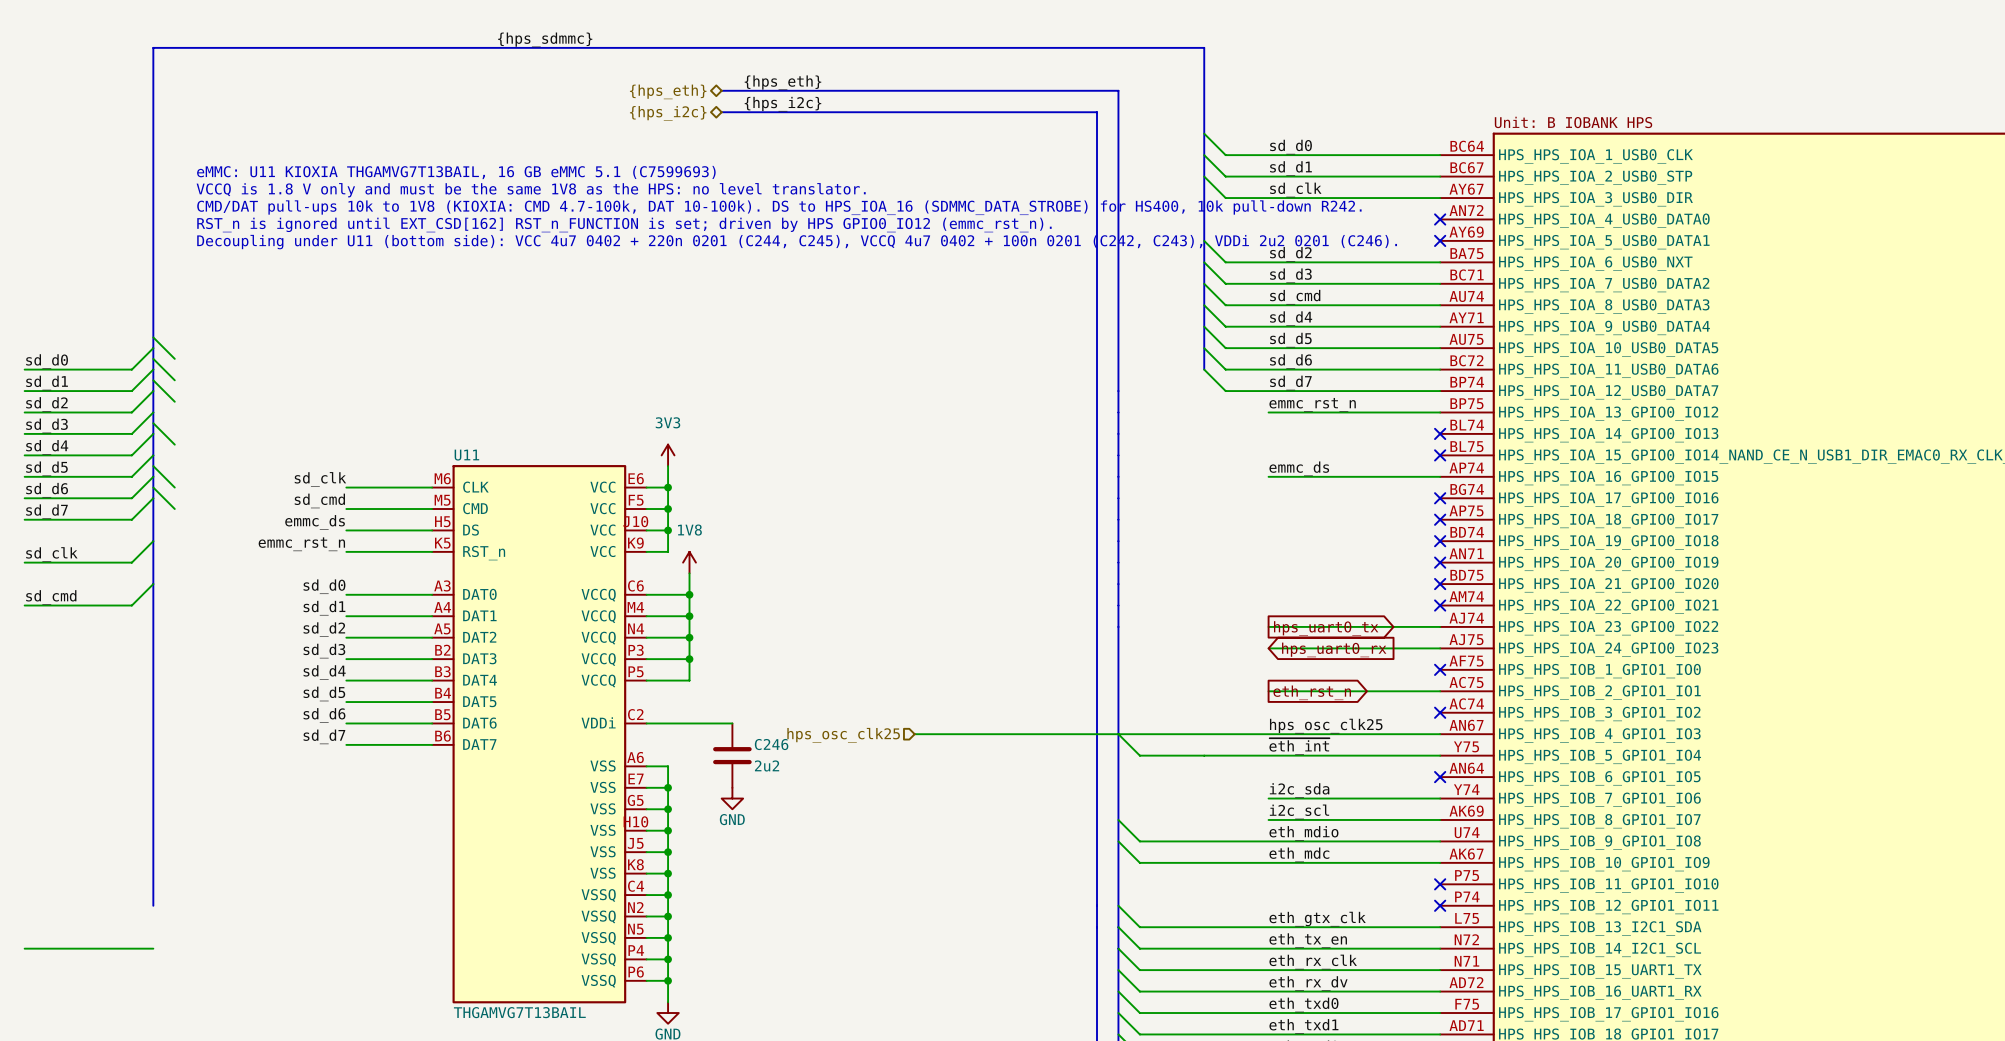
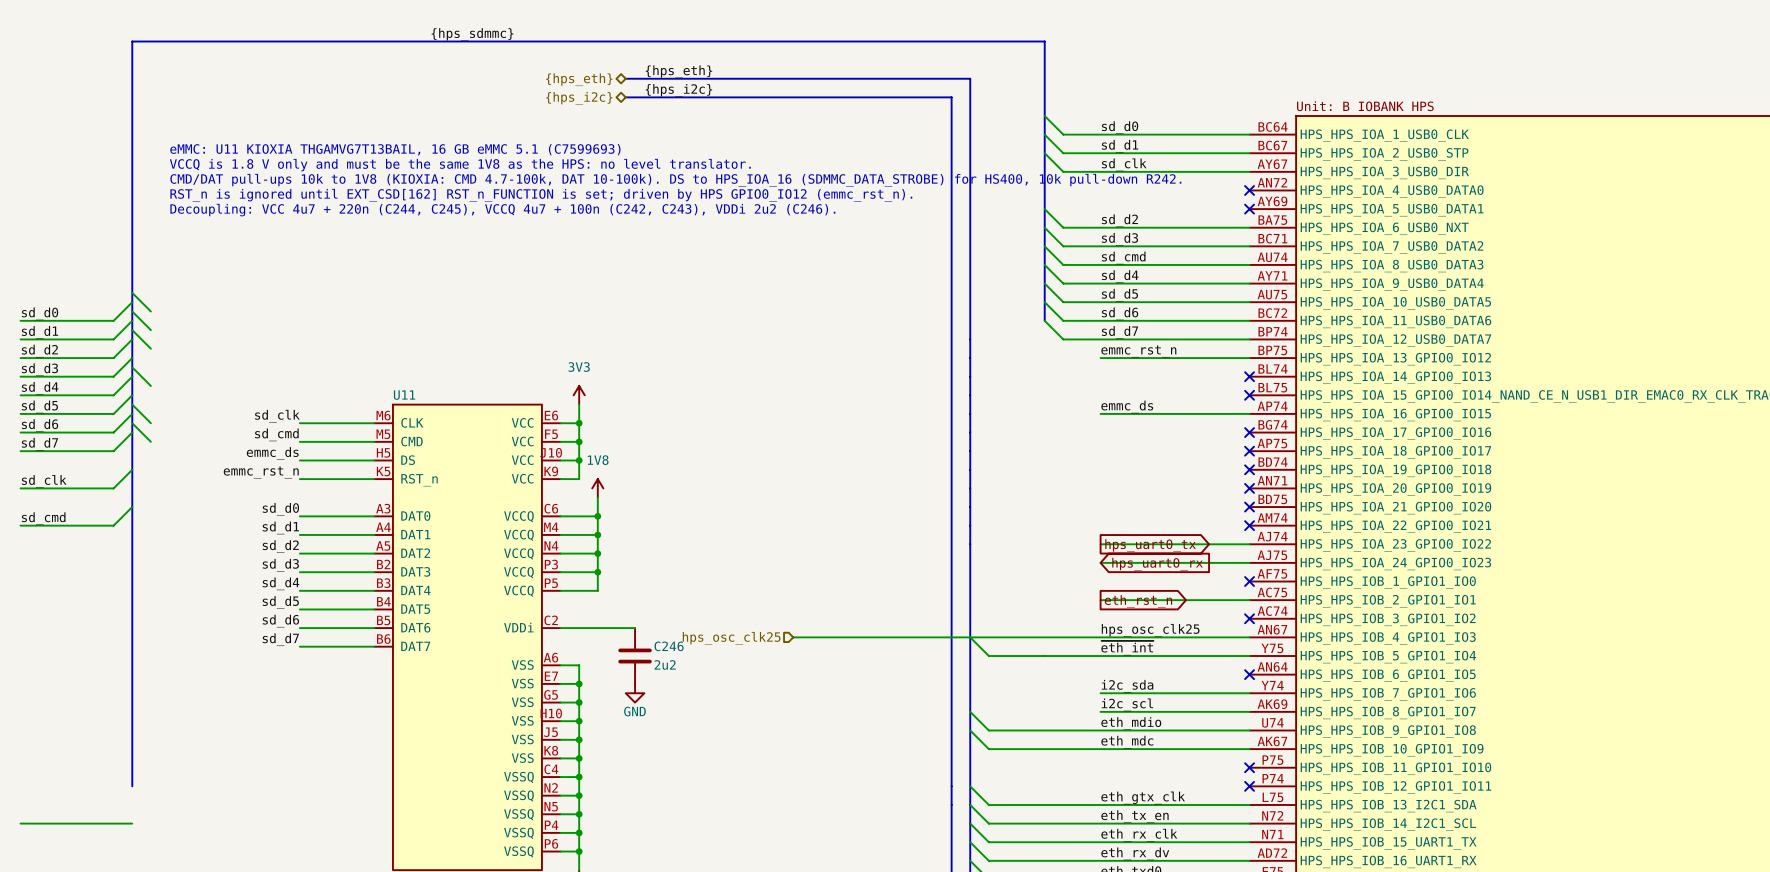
text: Decoupling under U11 (bottom side): VCC 4u7 0402 + 220n 0201 (C244, C245), VCCQ 4u7 0402 + 100n 0201 (C242, C243), VDDi 2u2 0201 (C246). (797, 242) -> Decoupling: VCC 4u7 + 220n (C244, C245), VCCQ 4u7 + 100n (C242, C243), VDDi 2u2 (C246). (502, 210)

